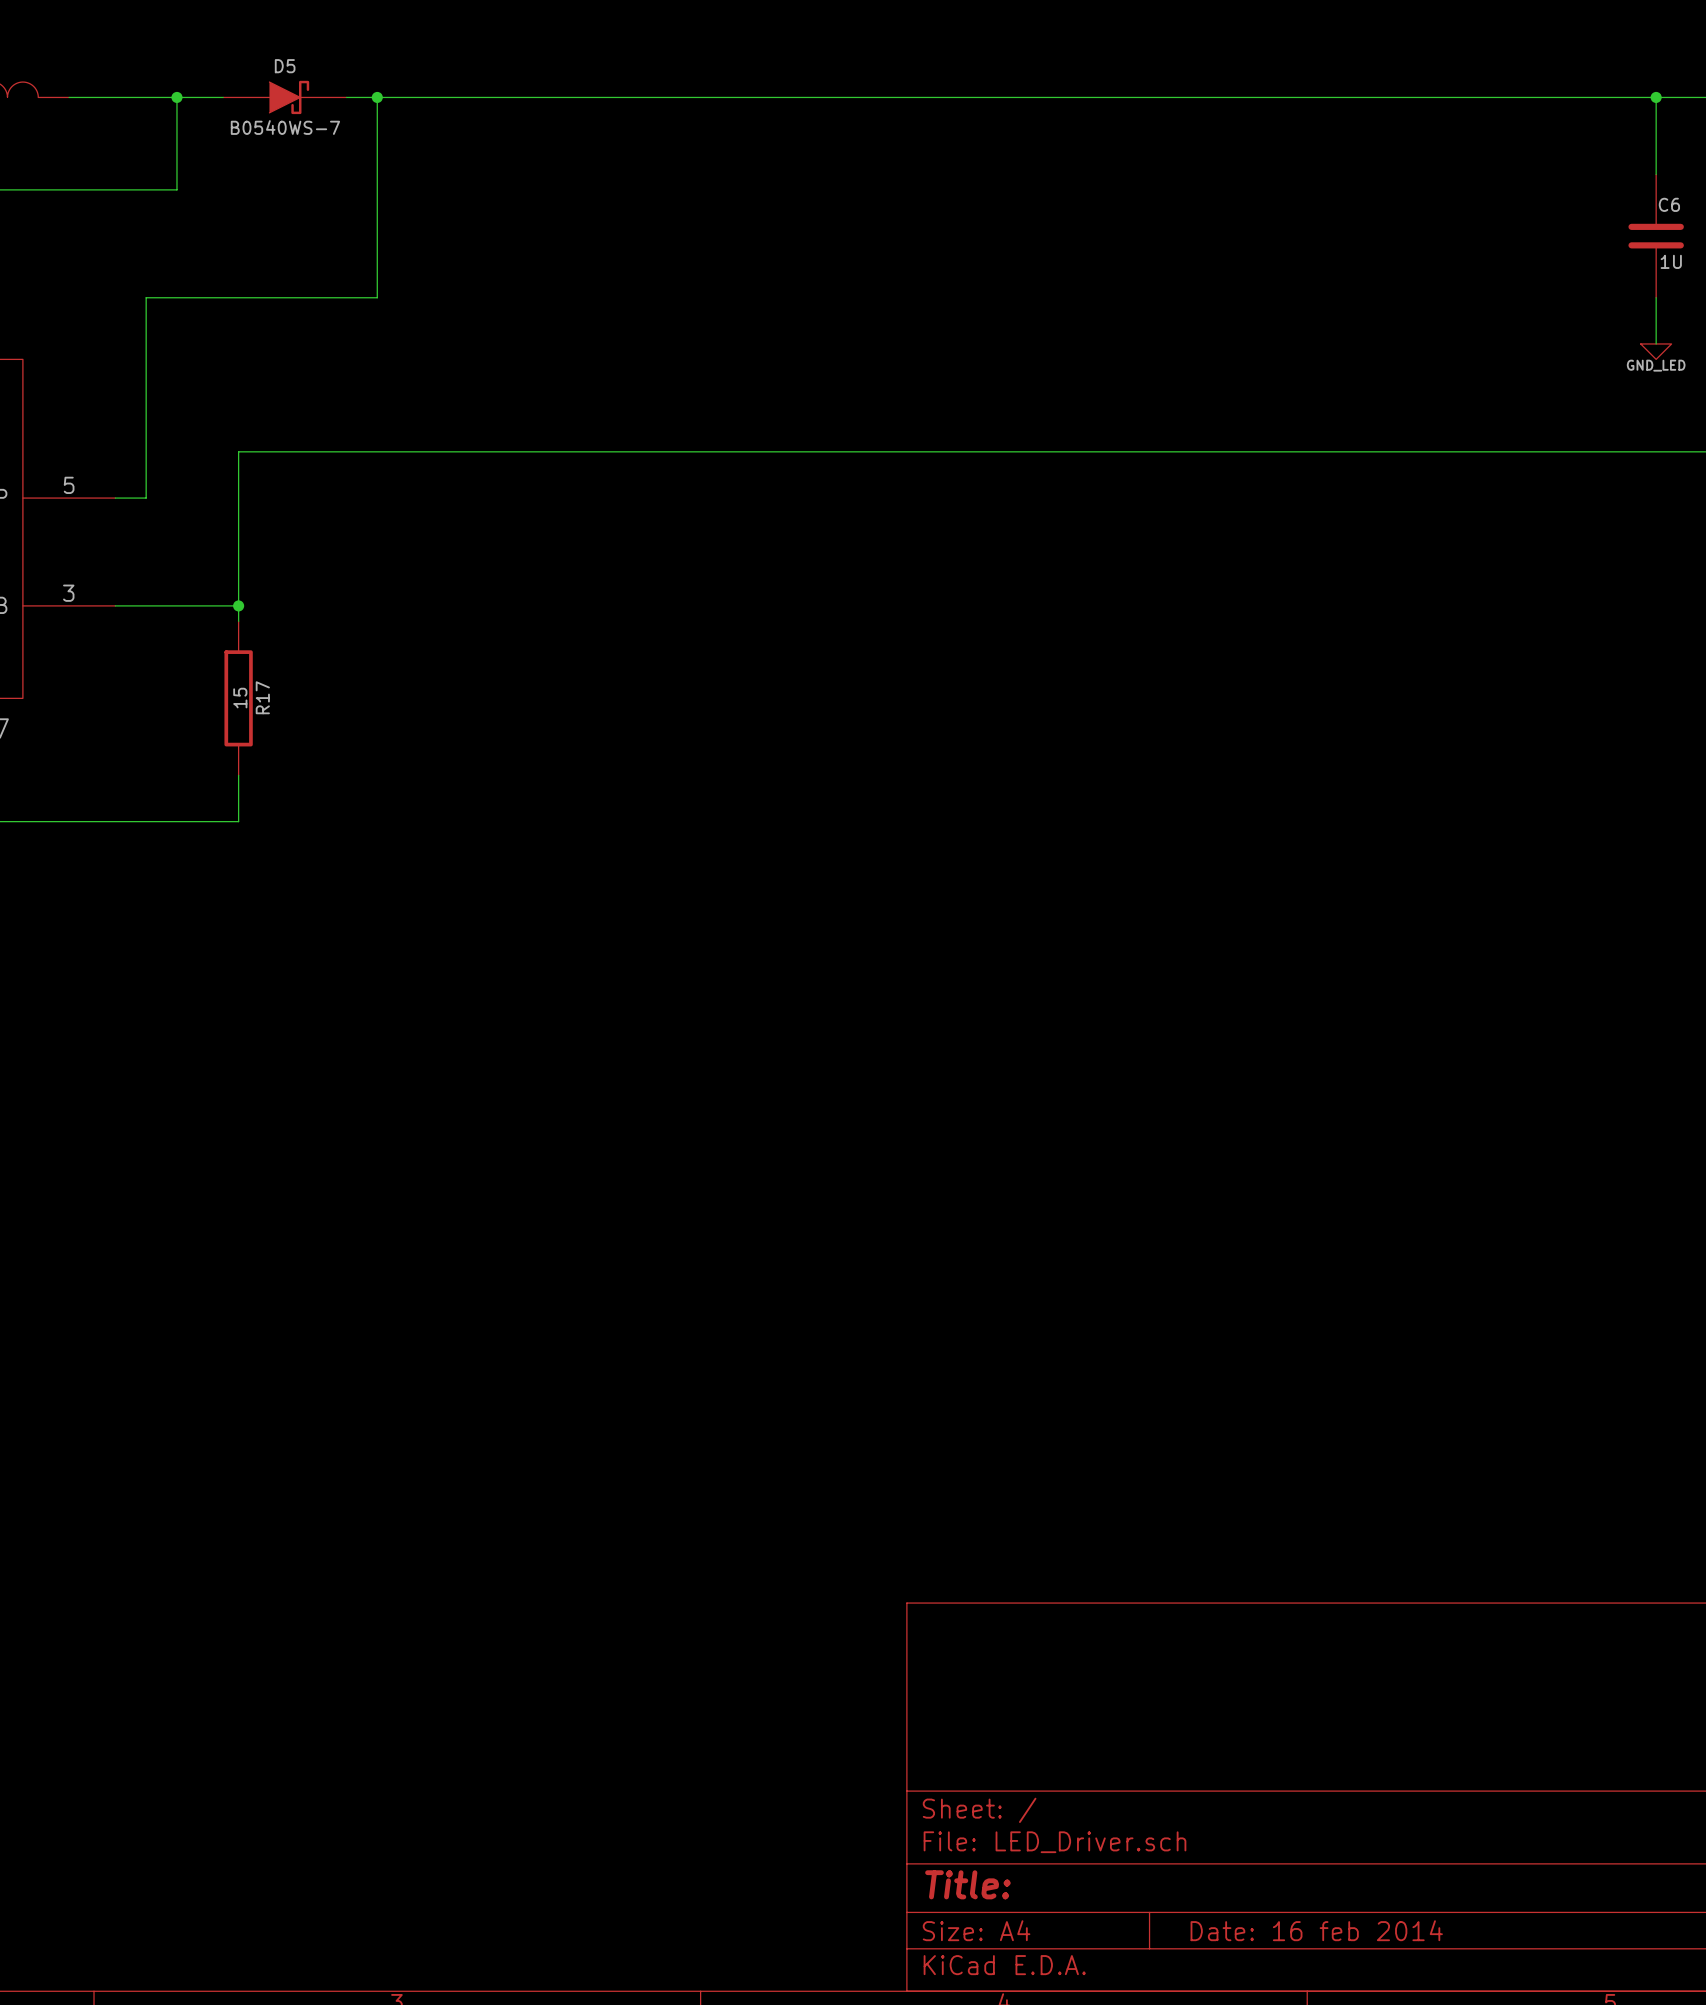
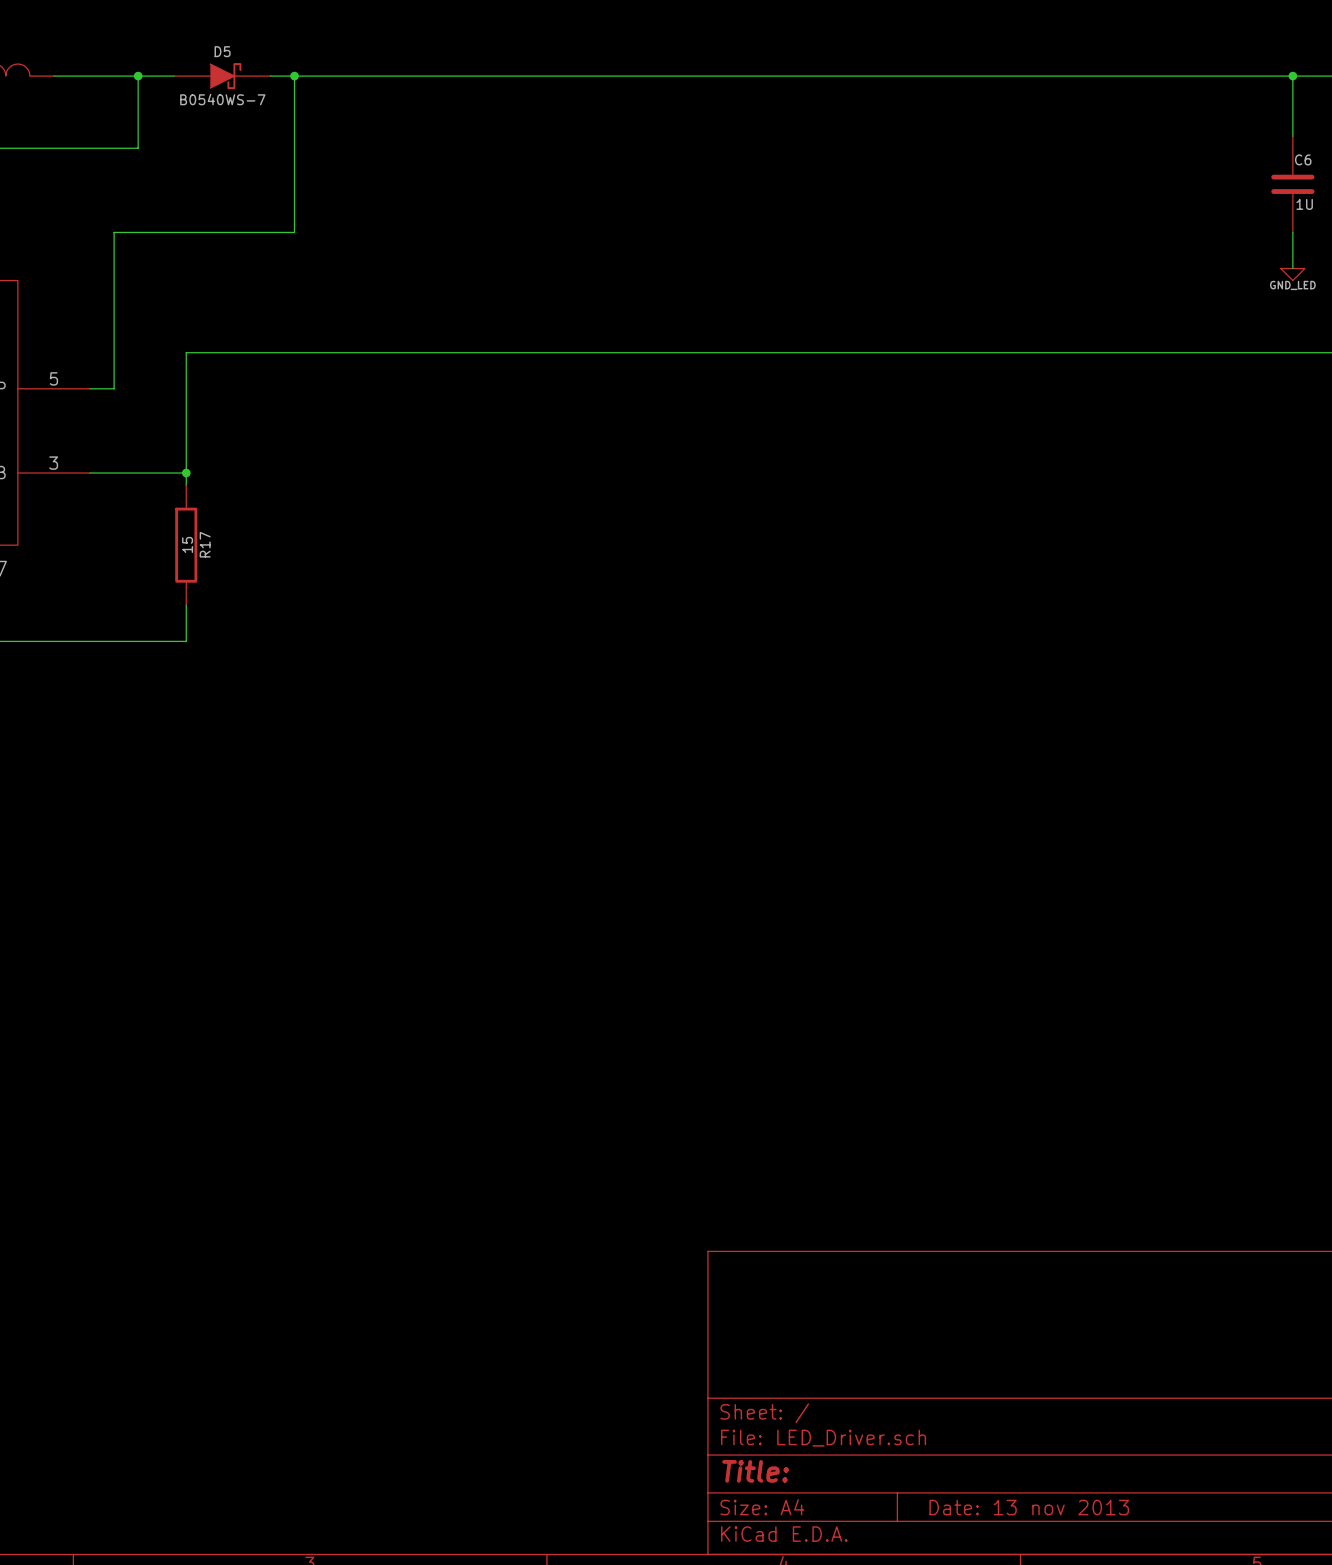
title block: Date: 16 feb 2014 (1316, 1930) -> Date: 13 nov 2013 (1029, 1507)

